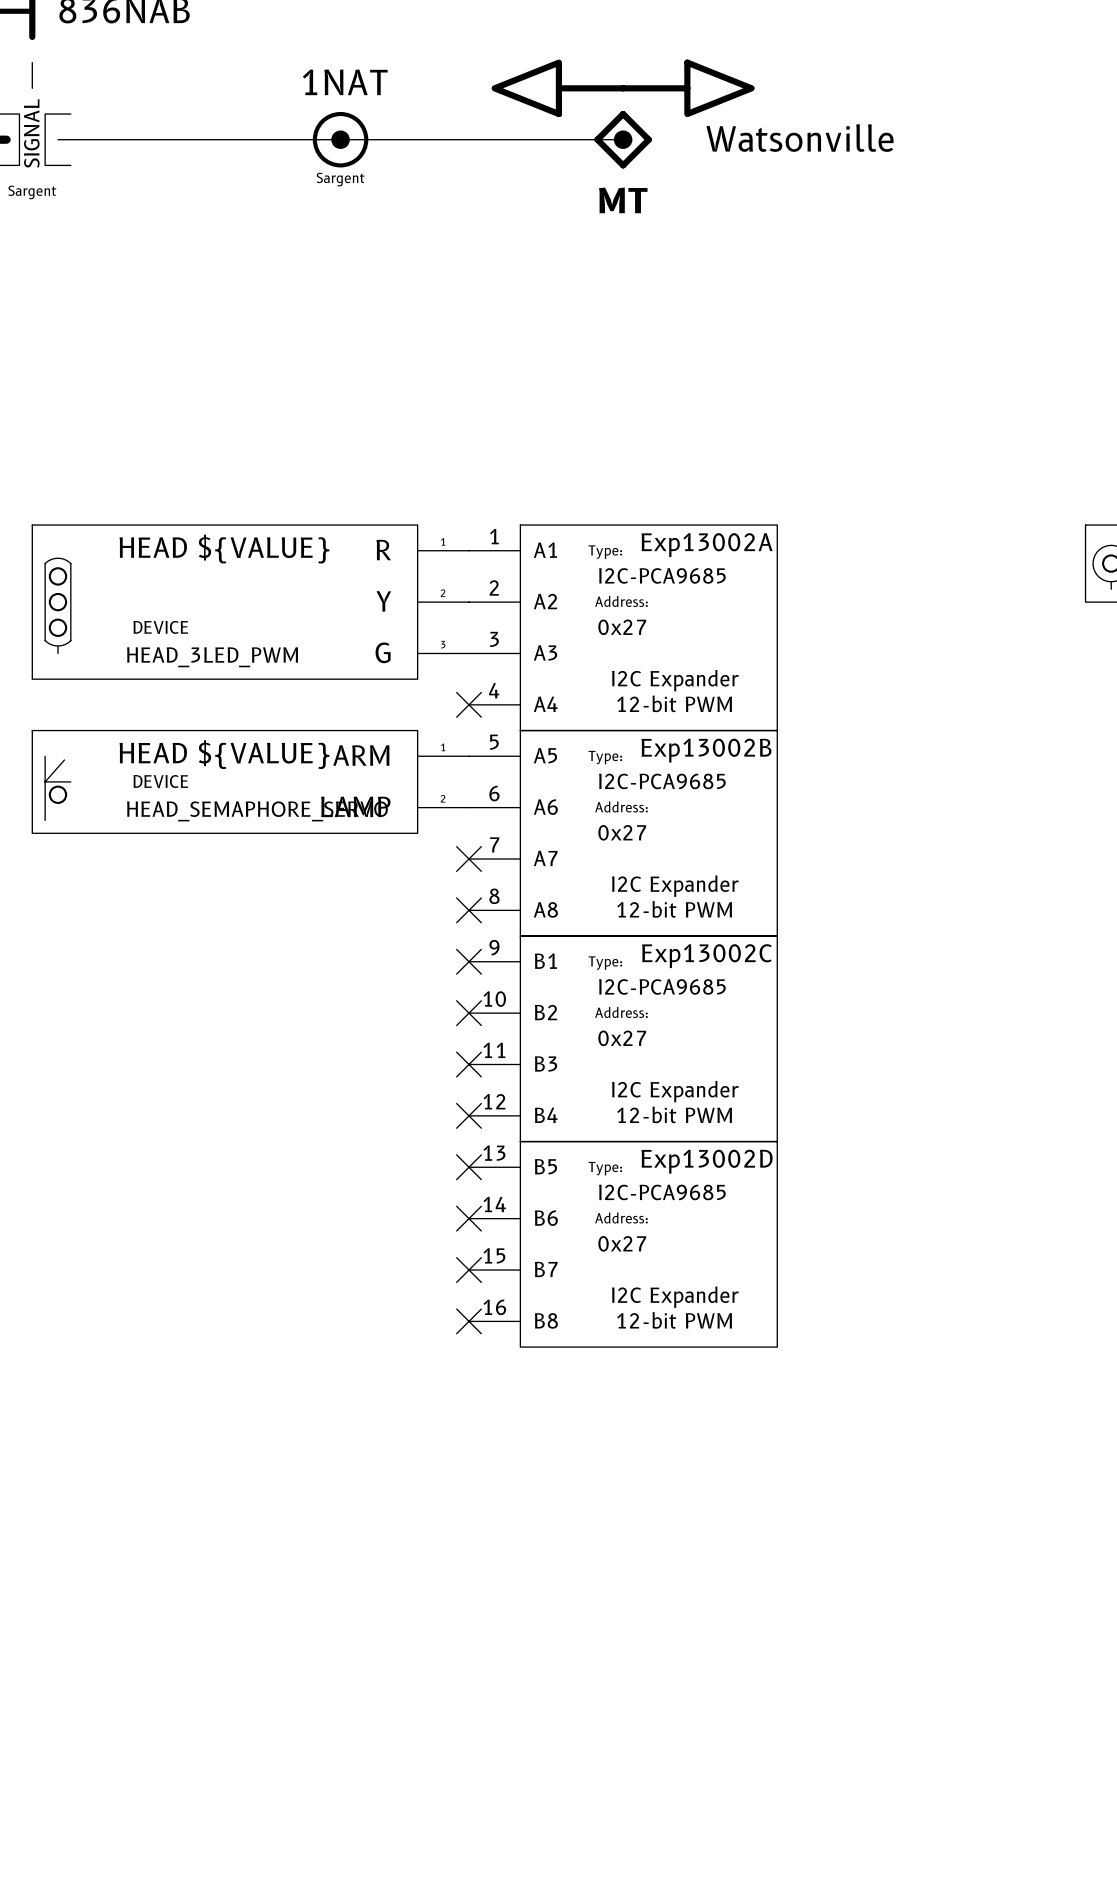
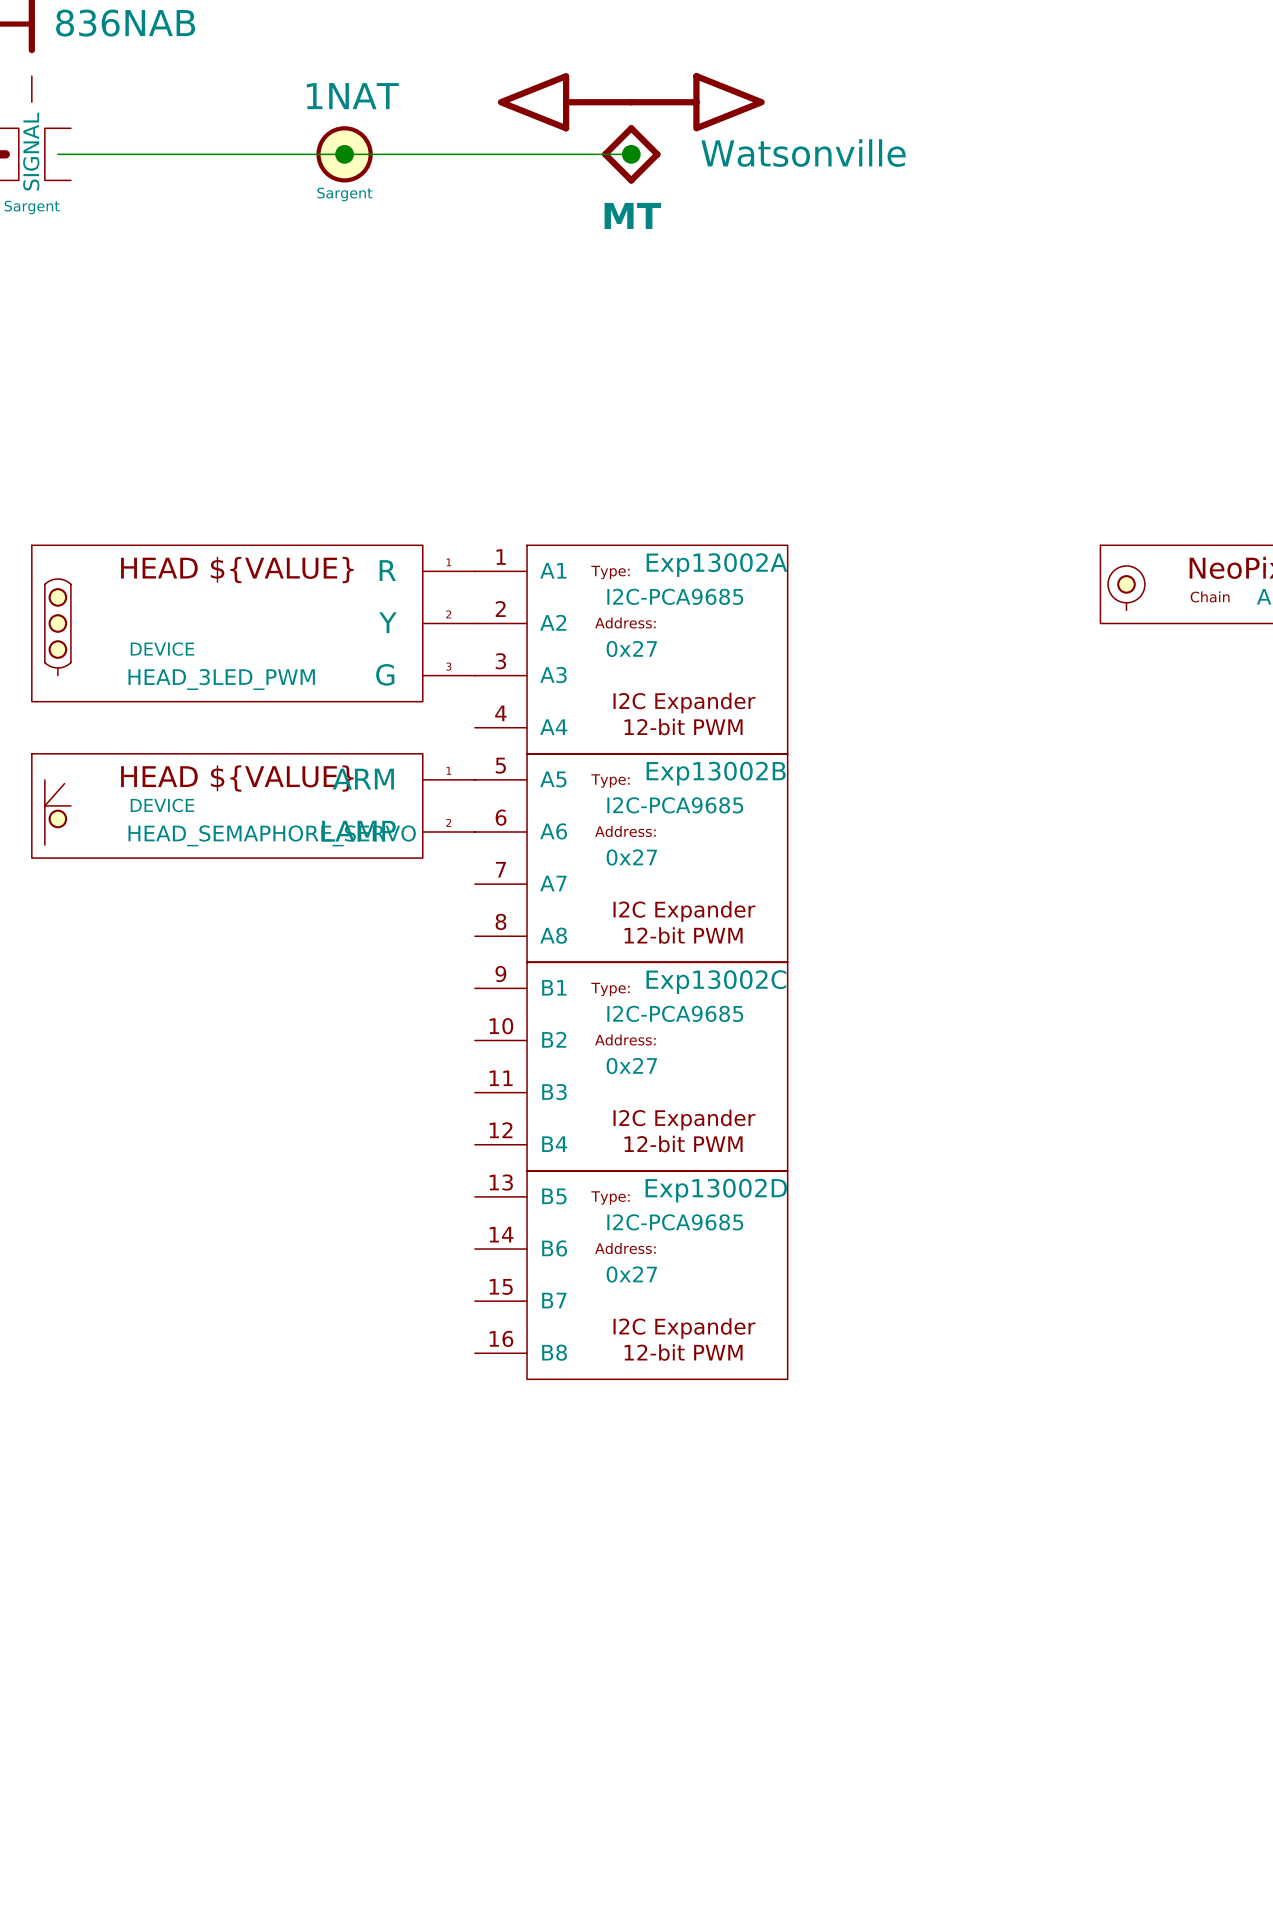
no-connect mark: (469, 704) -> none
no-connect mark: (469, 858) -> none
no-connect mark: (469, 910) -> none
no-connect mark: (469, 961) -> none
no-connect mark: (469, 1013) -> none
no-connect mark: (469, 1064) -> none
no-connect mark: (469, 1115) -> none
no-connect mark: (469, 1167) -> none
no-connect mark: (469, 1218) -> none
no-connect mark: (469, 1270) -> none
no-connect mark: (469, 1321) -> none

